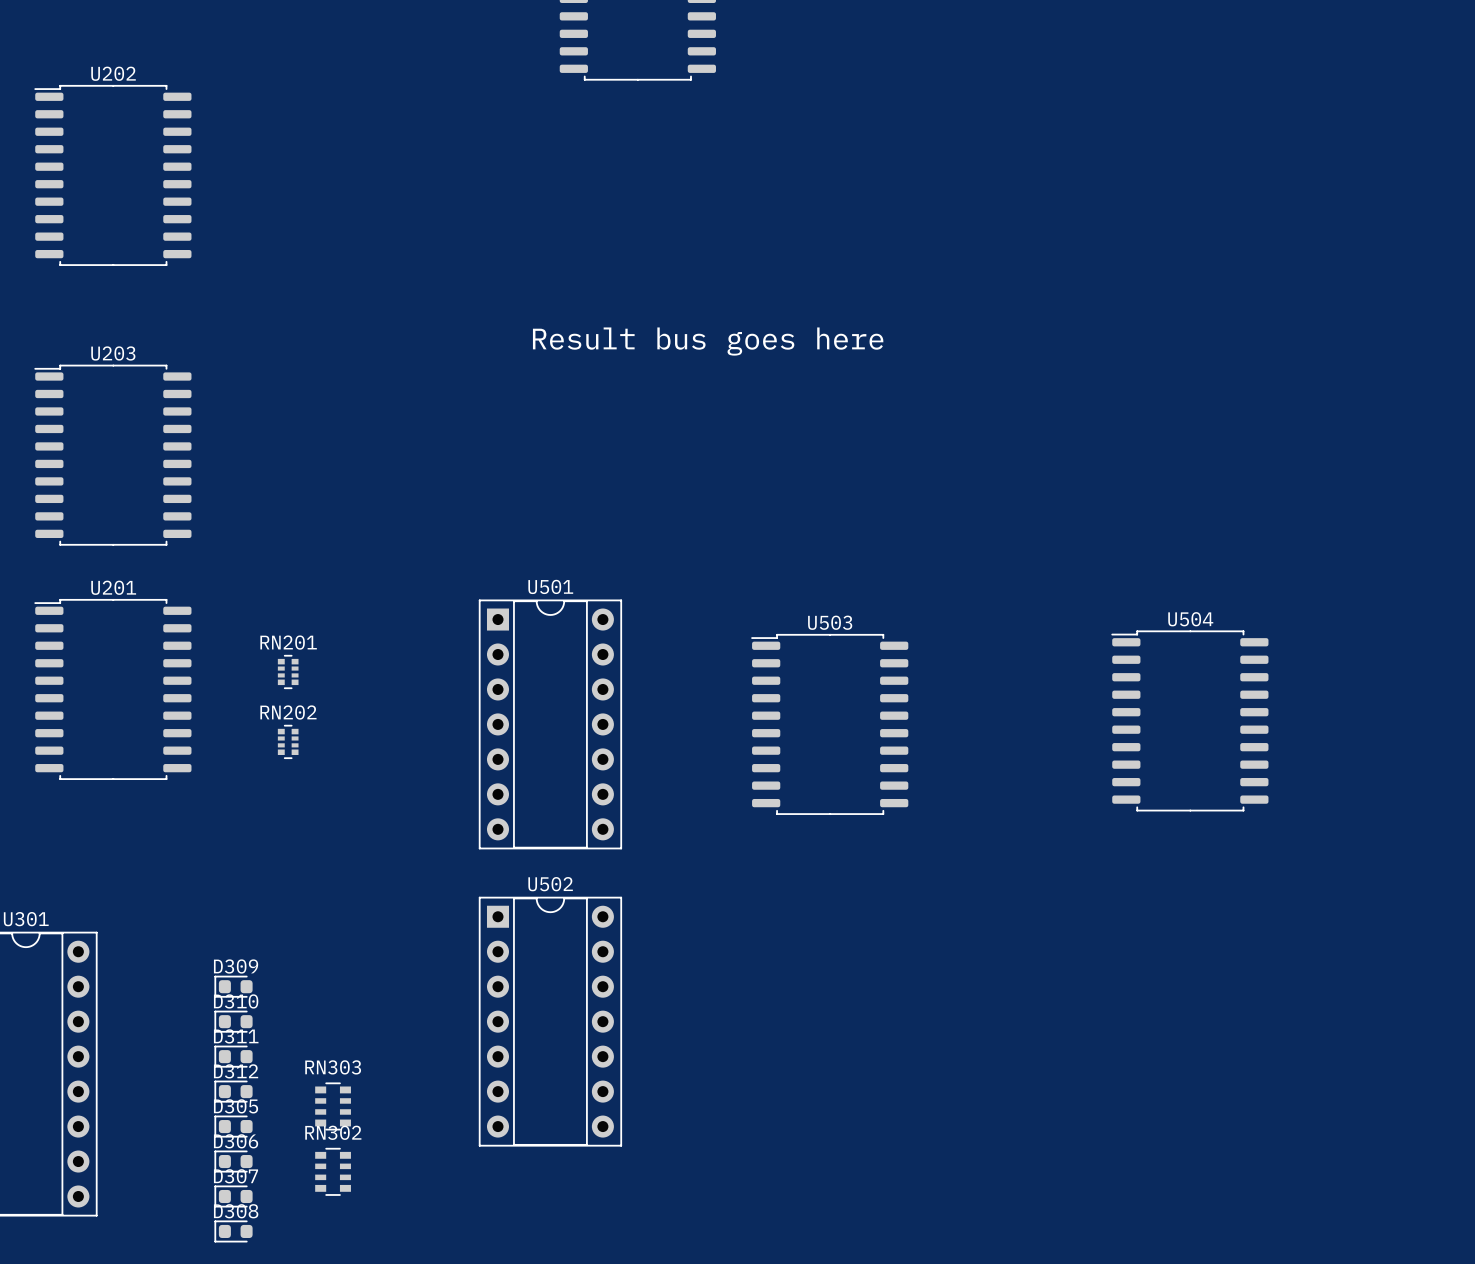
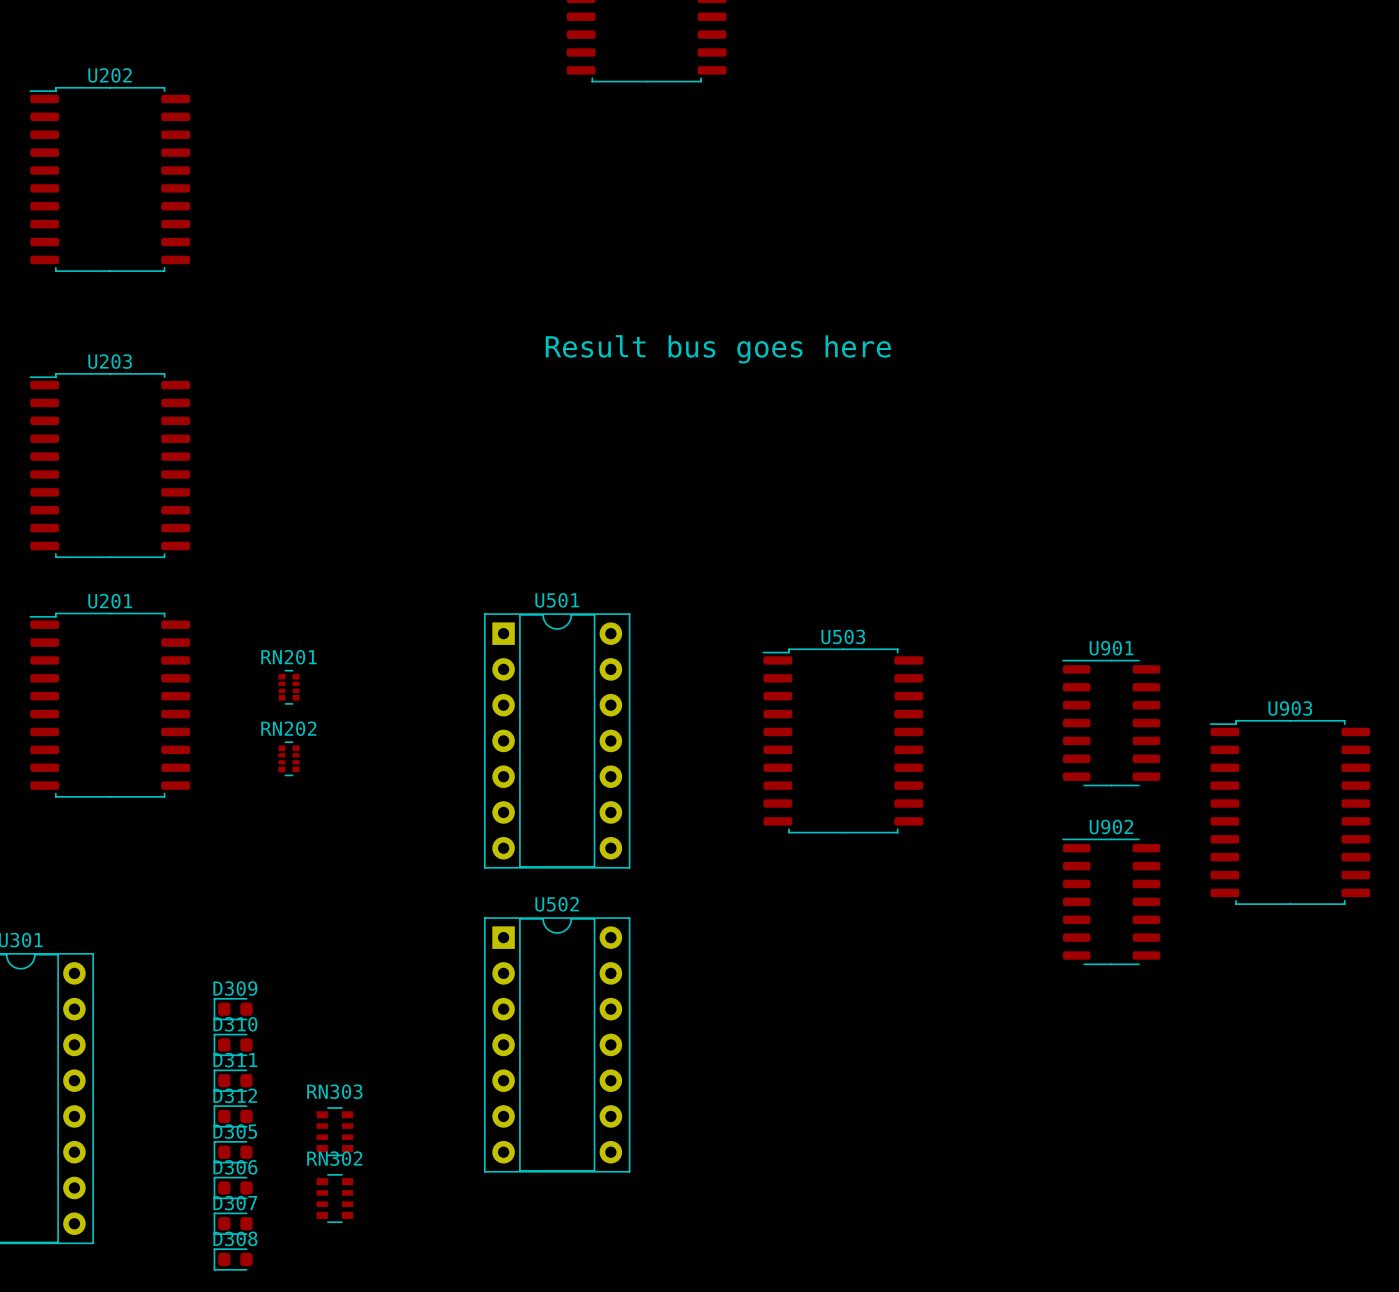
U901: none -> (1111, 723)
U504: (1189, 720) -> none
U903: none -> (1289, 812)
U902: none -> (1111, 901)

